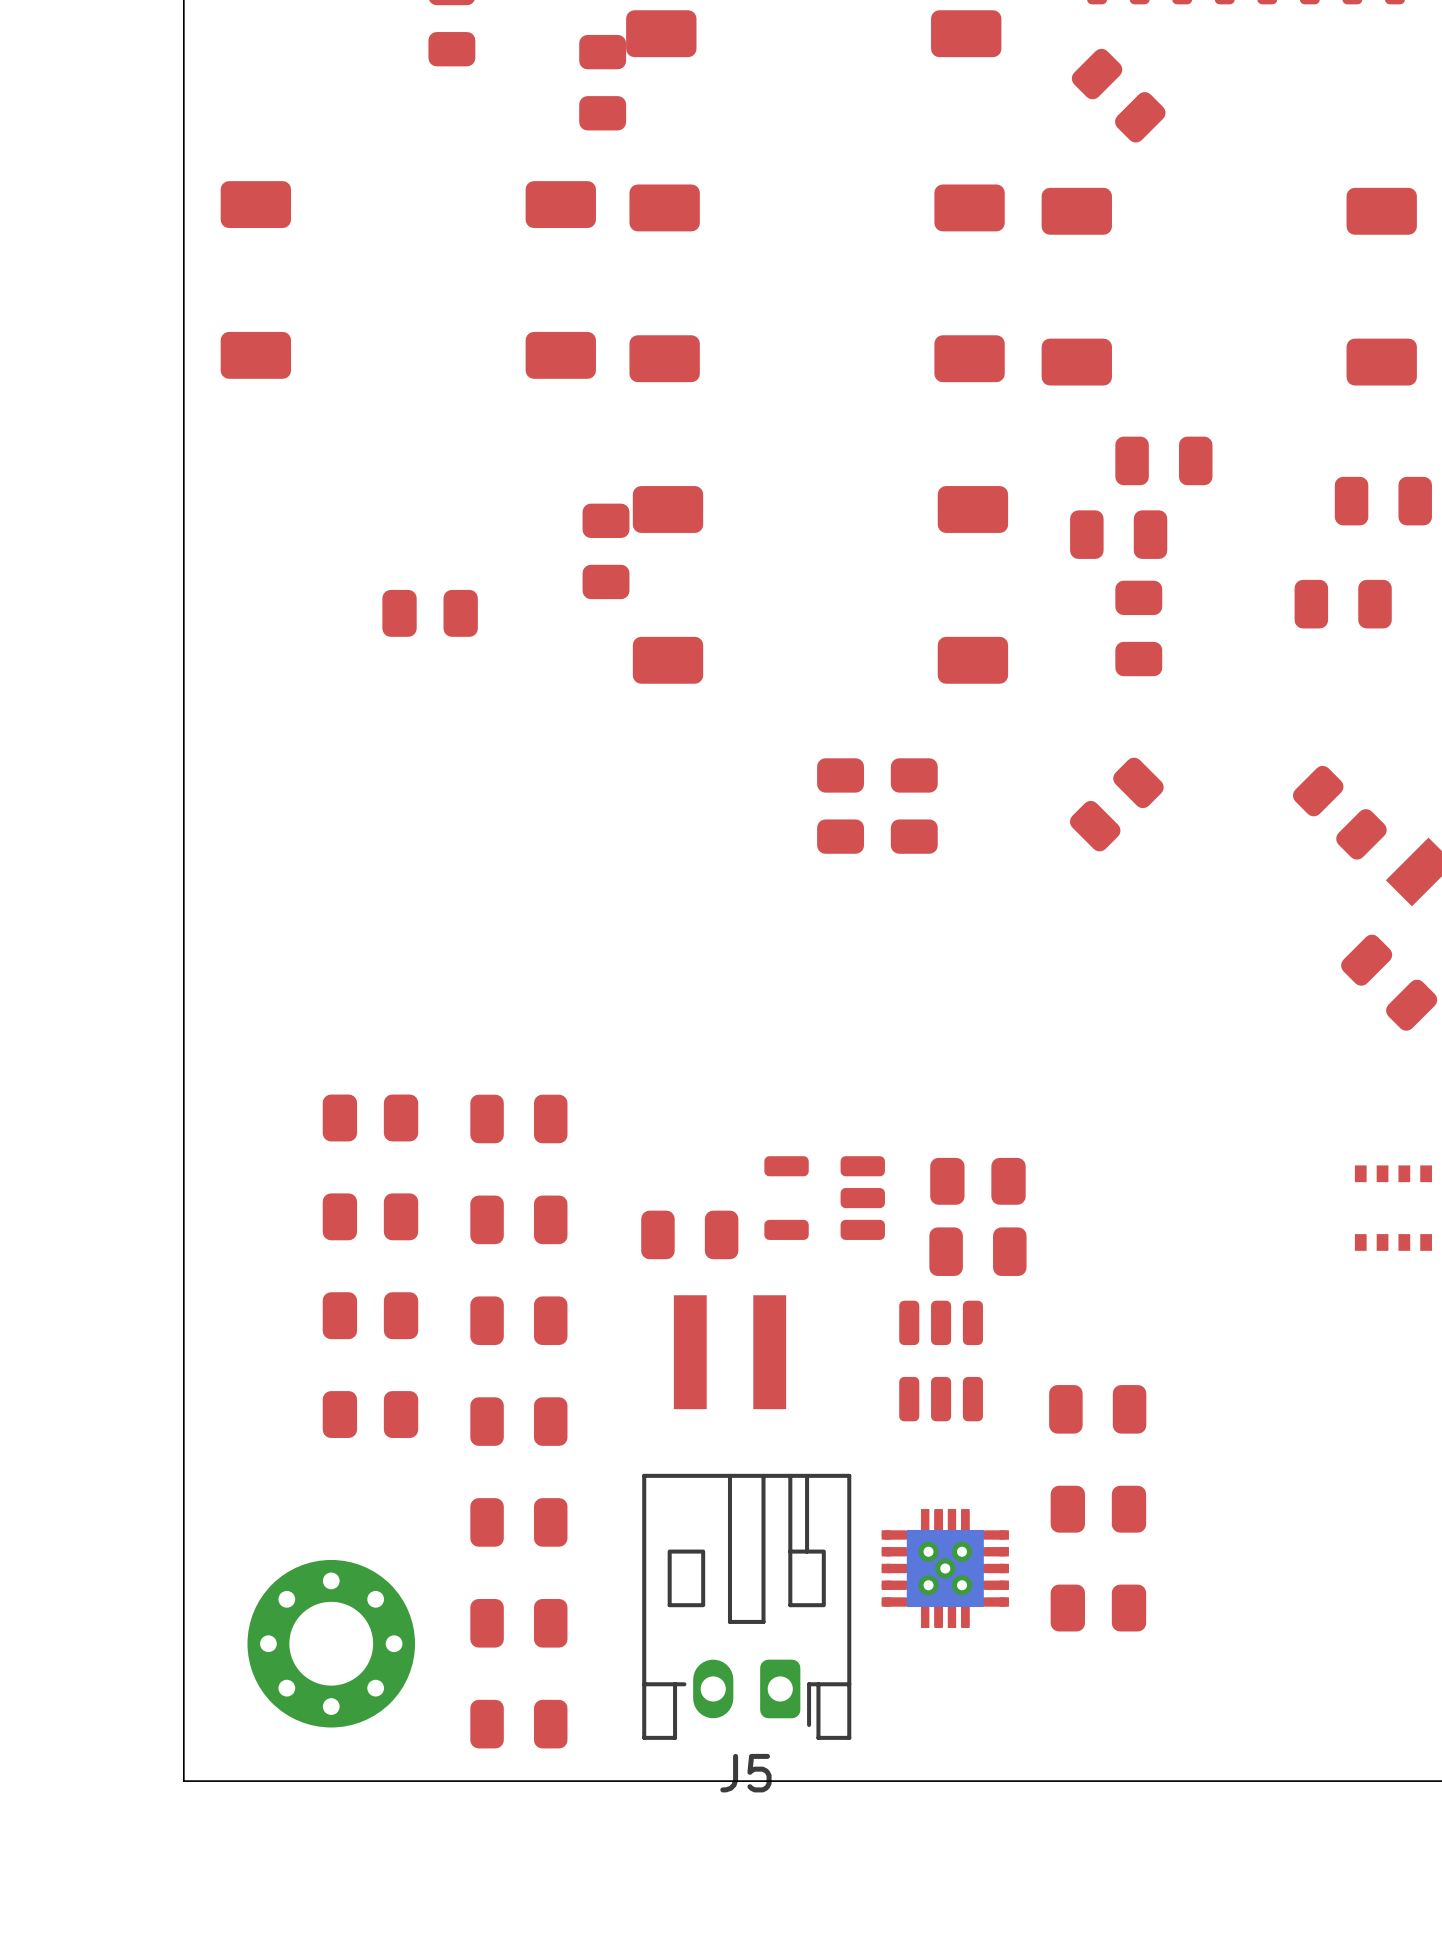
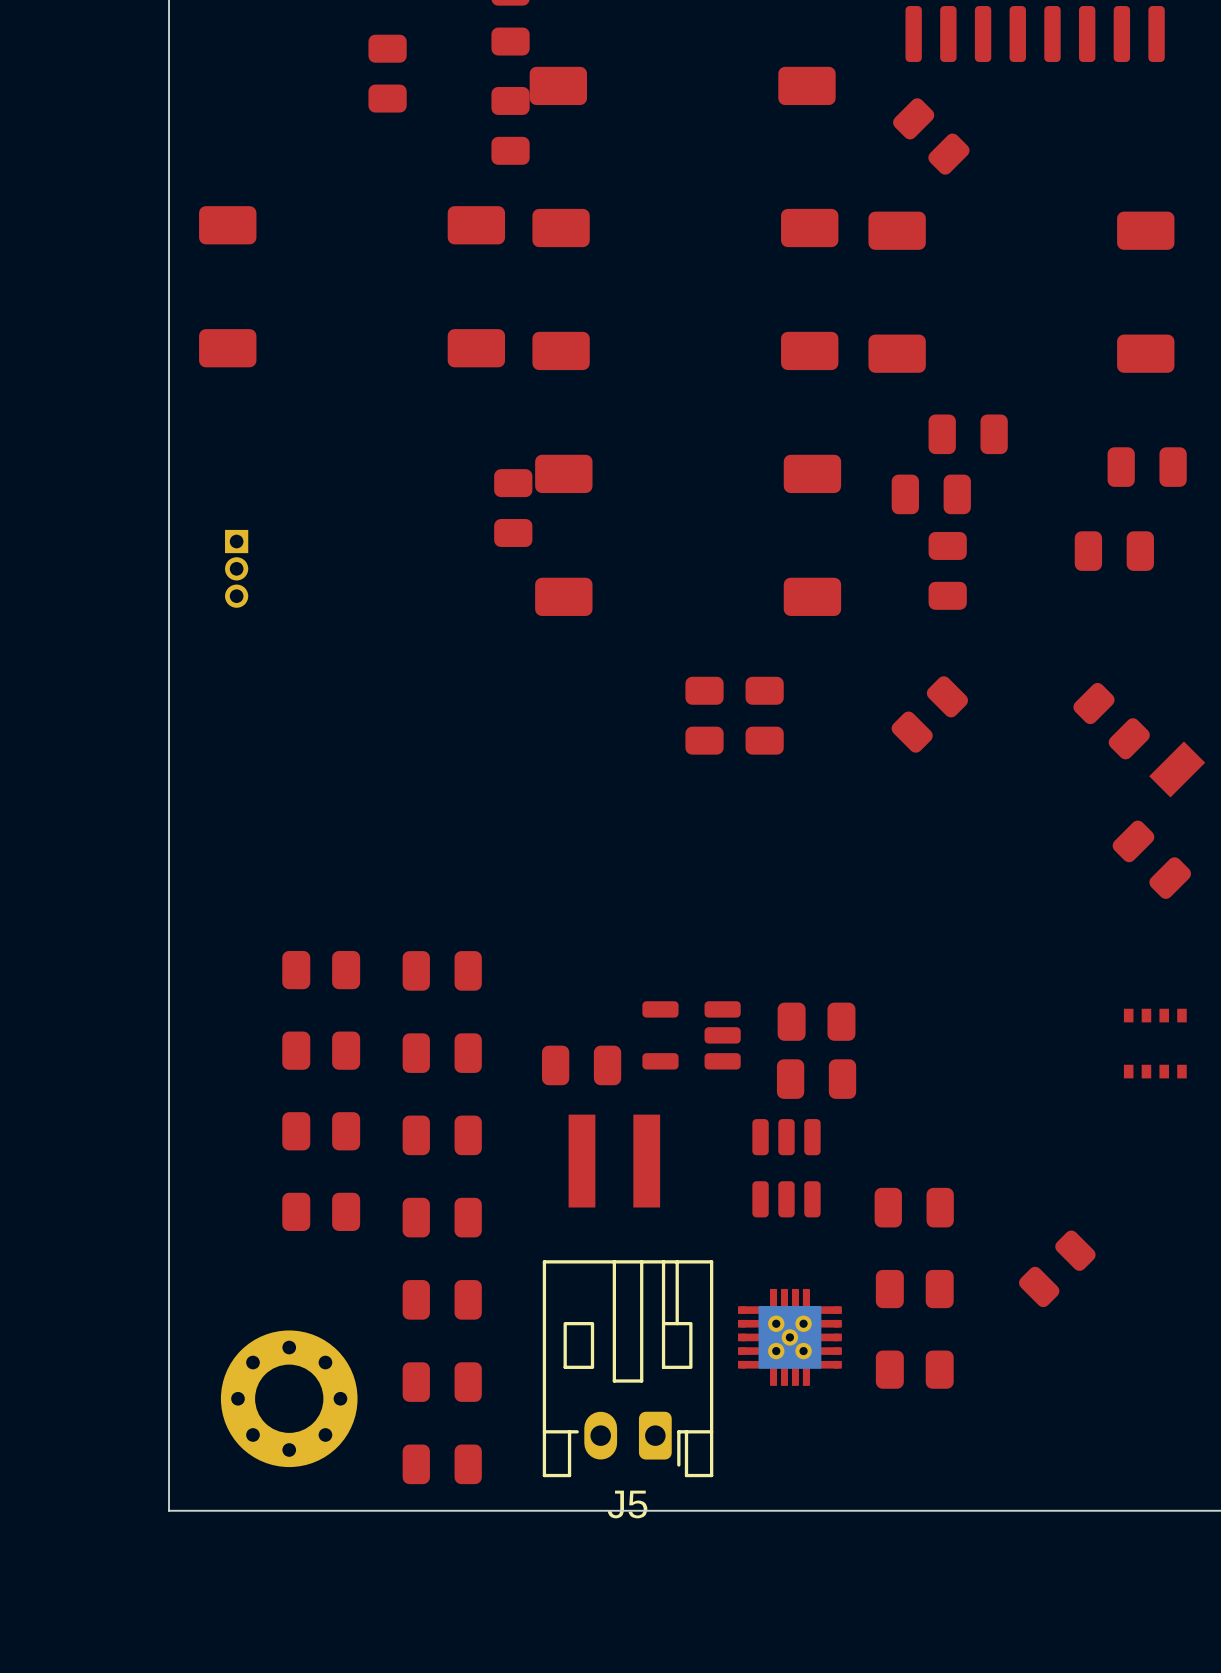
part: (430, 613) -> none
part: none -> (236, 568)
part: none -> (1057, 1268)

